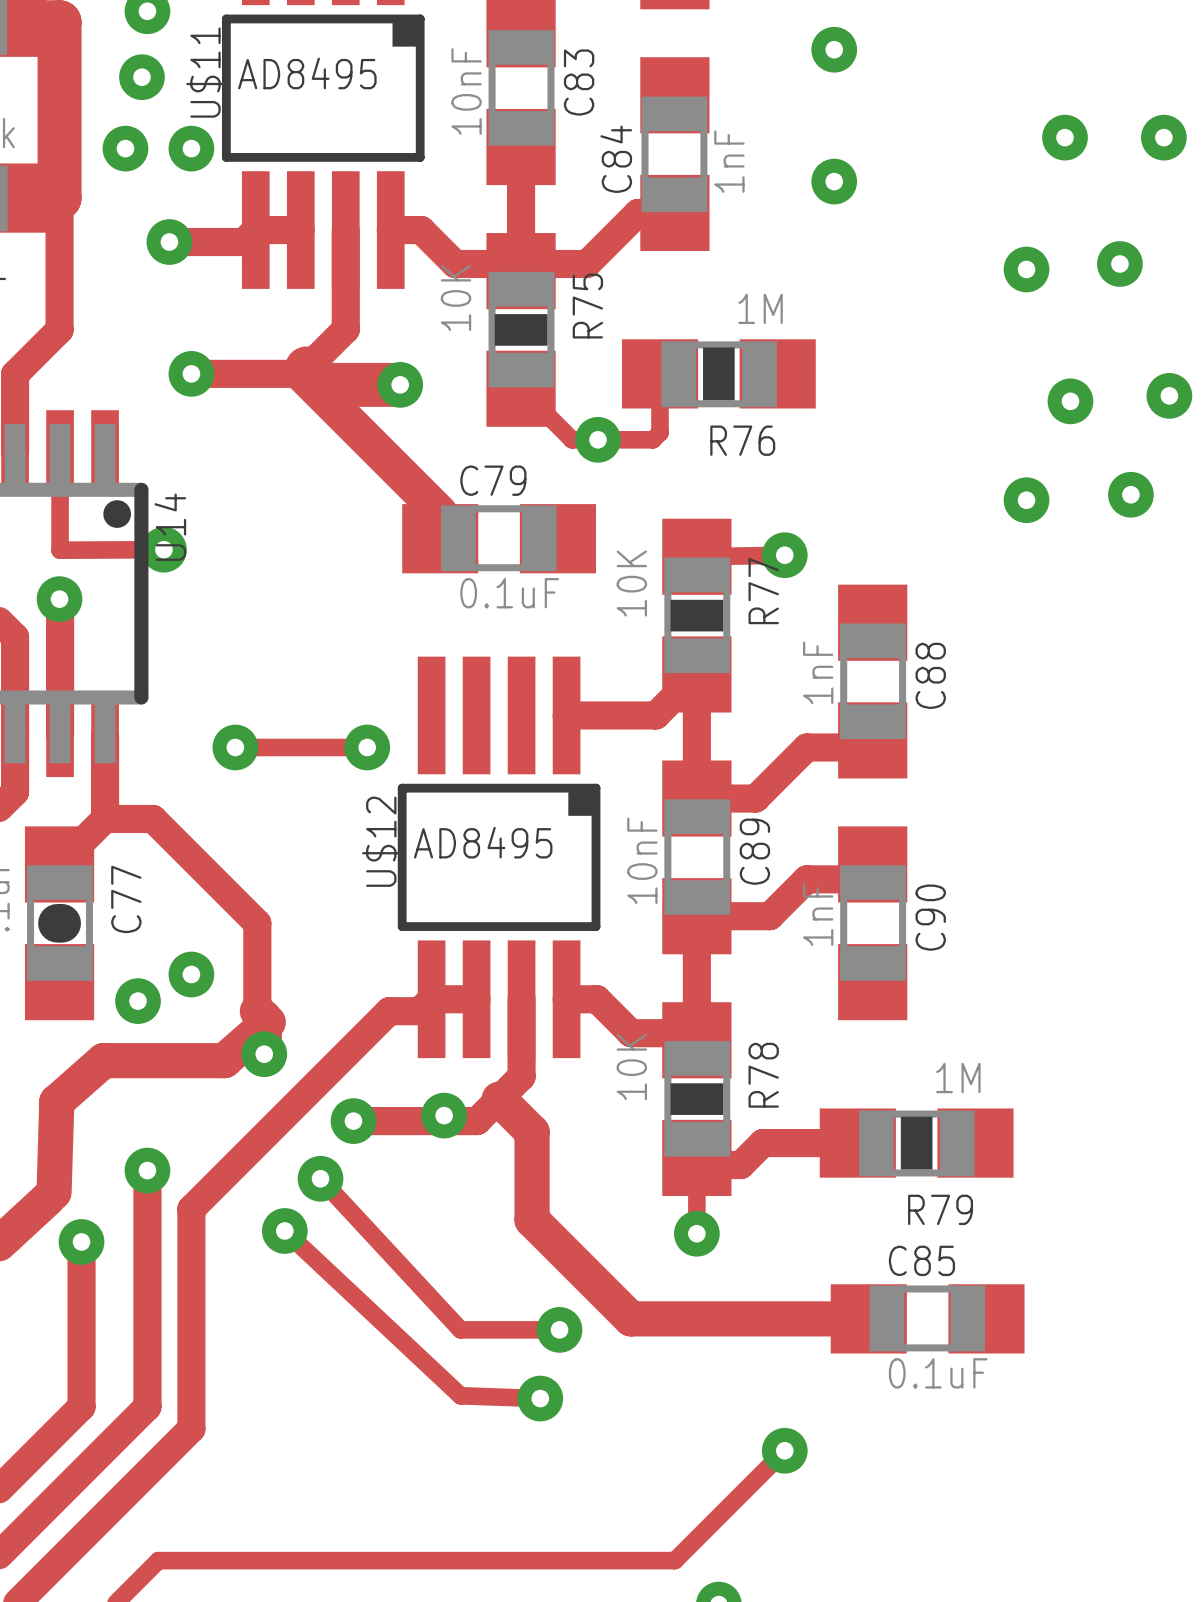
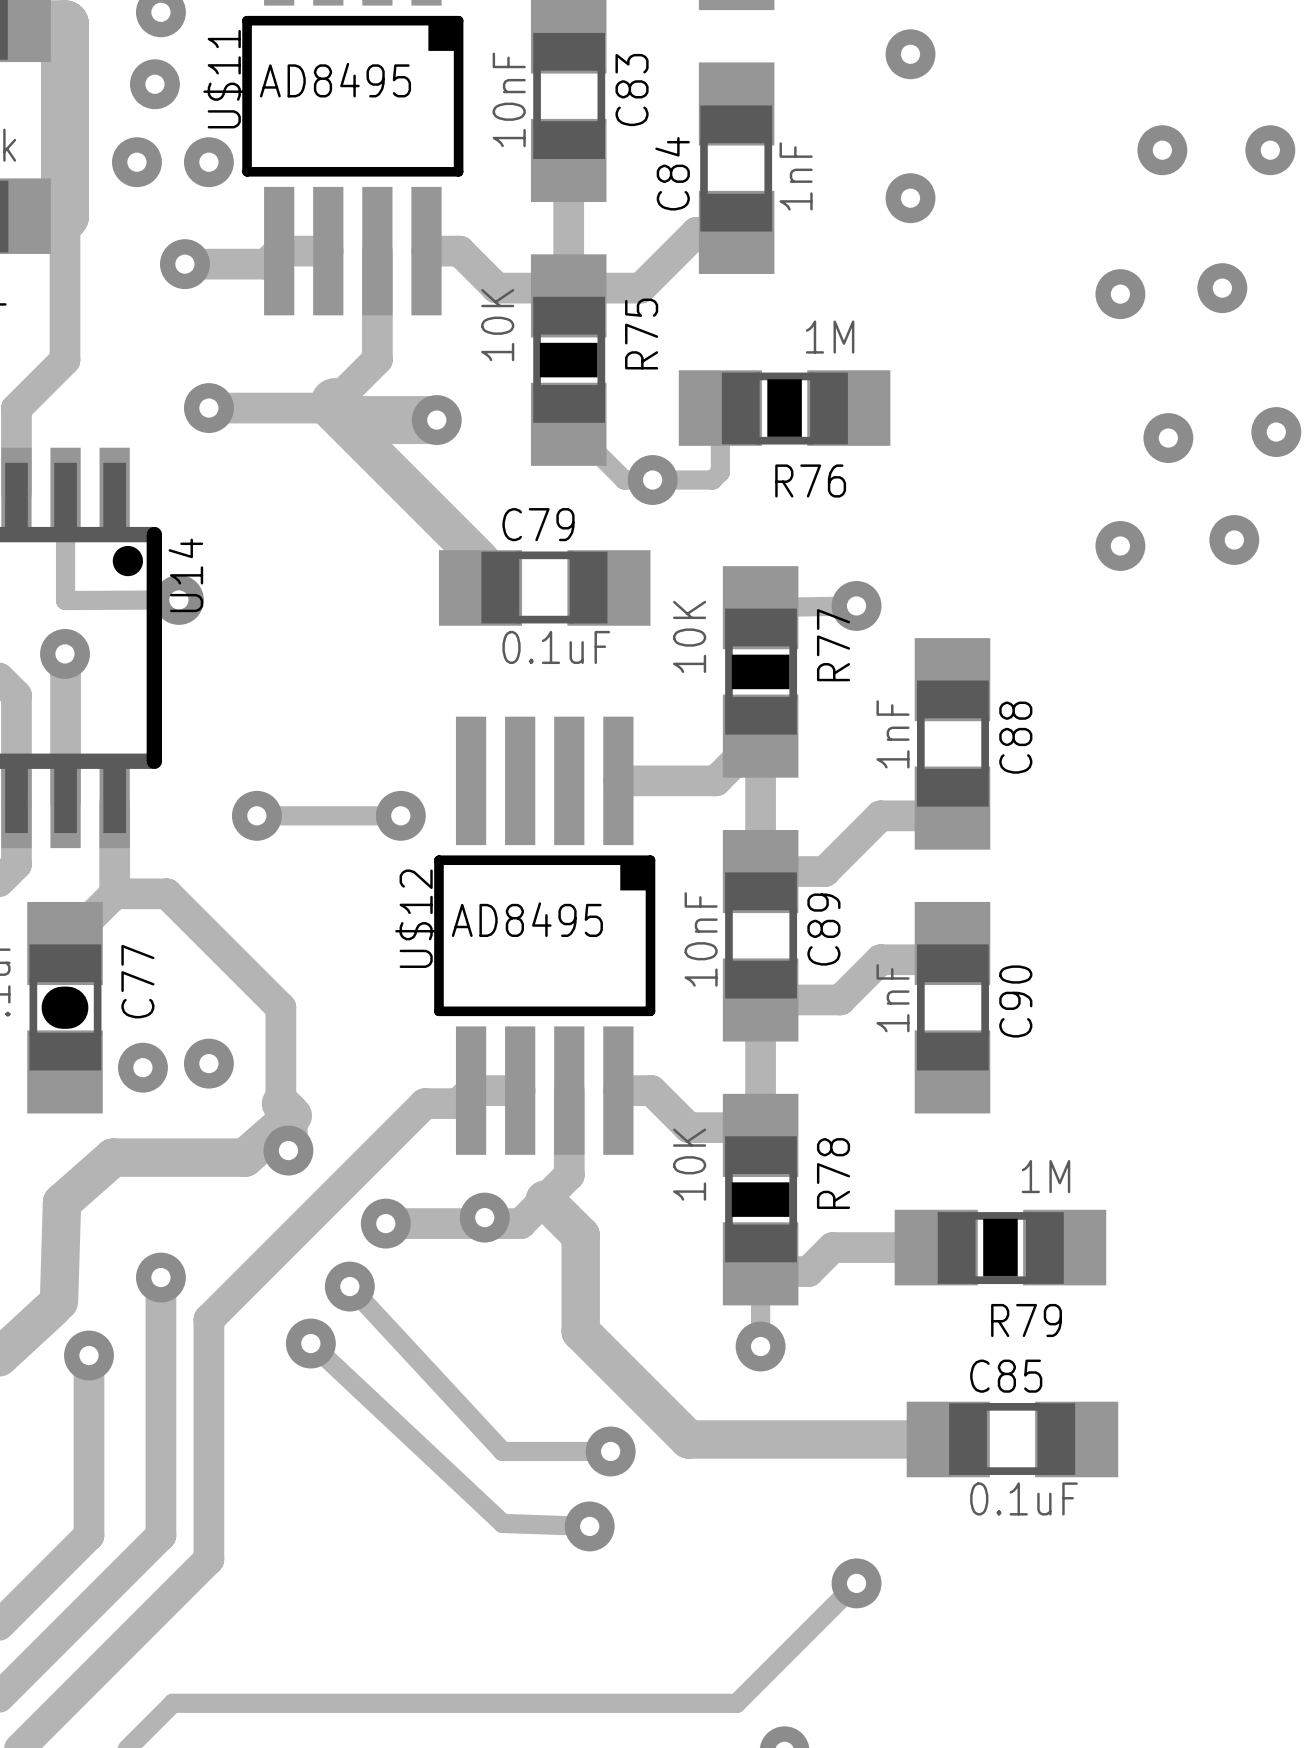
via position: (138, 1001) -> (142, 1067)

